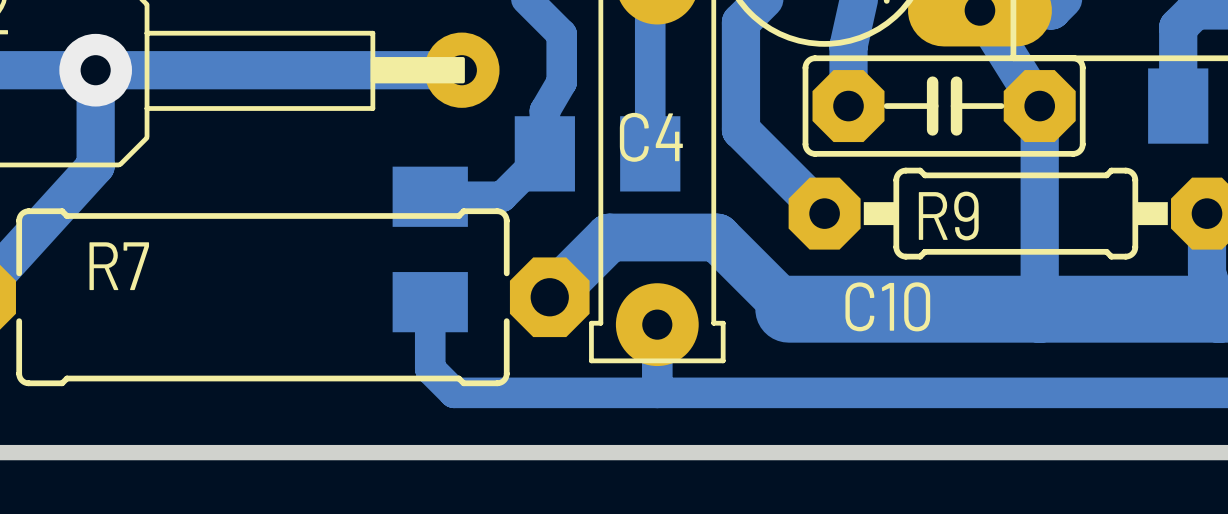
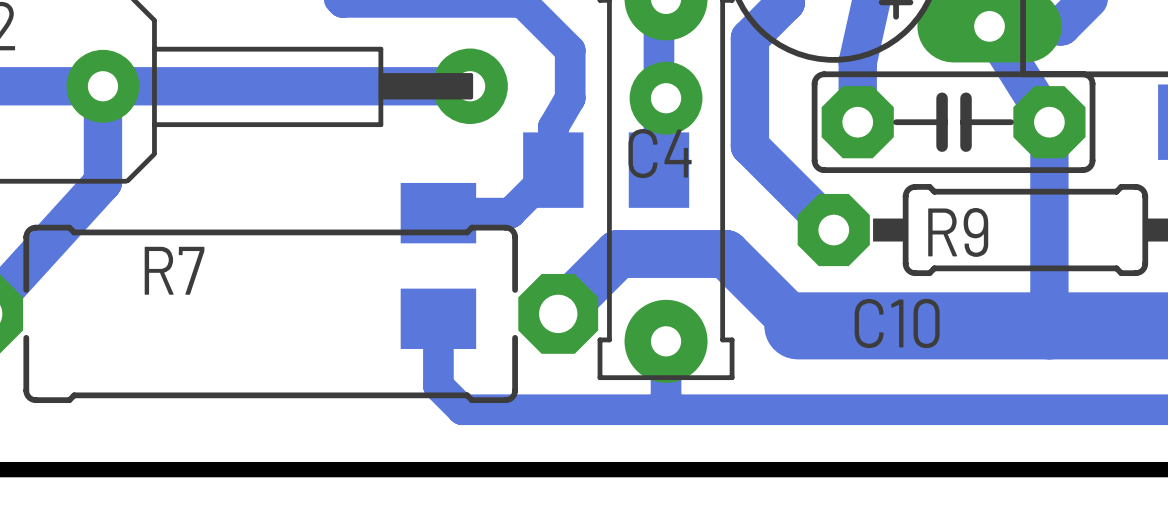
via: none -> (666, 98)
R7 name position: R7 (119, 266) -> R7 (174, 270)

